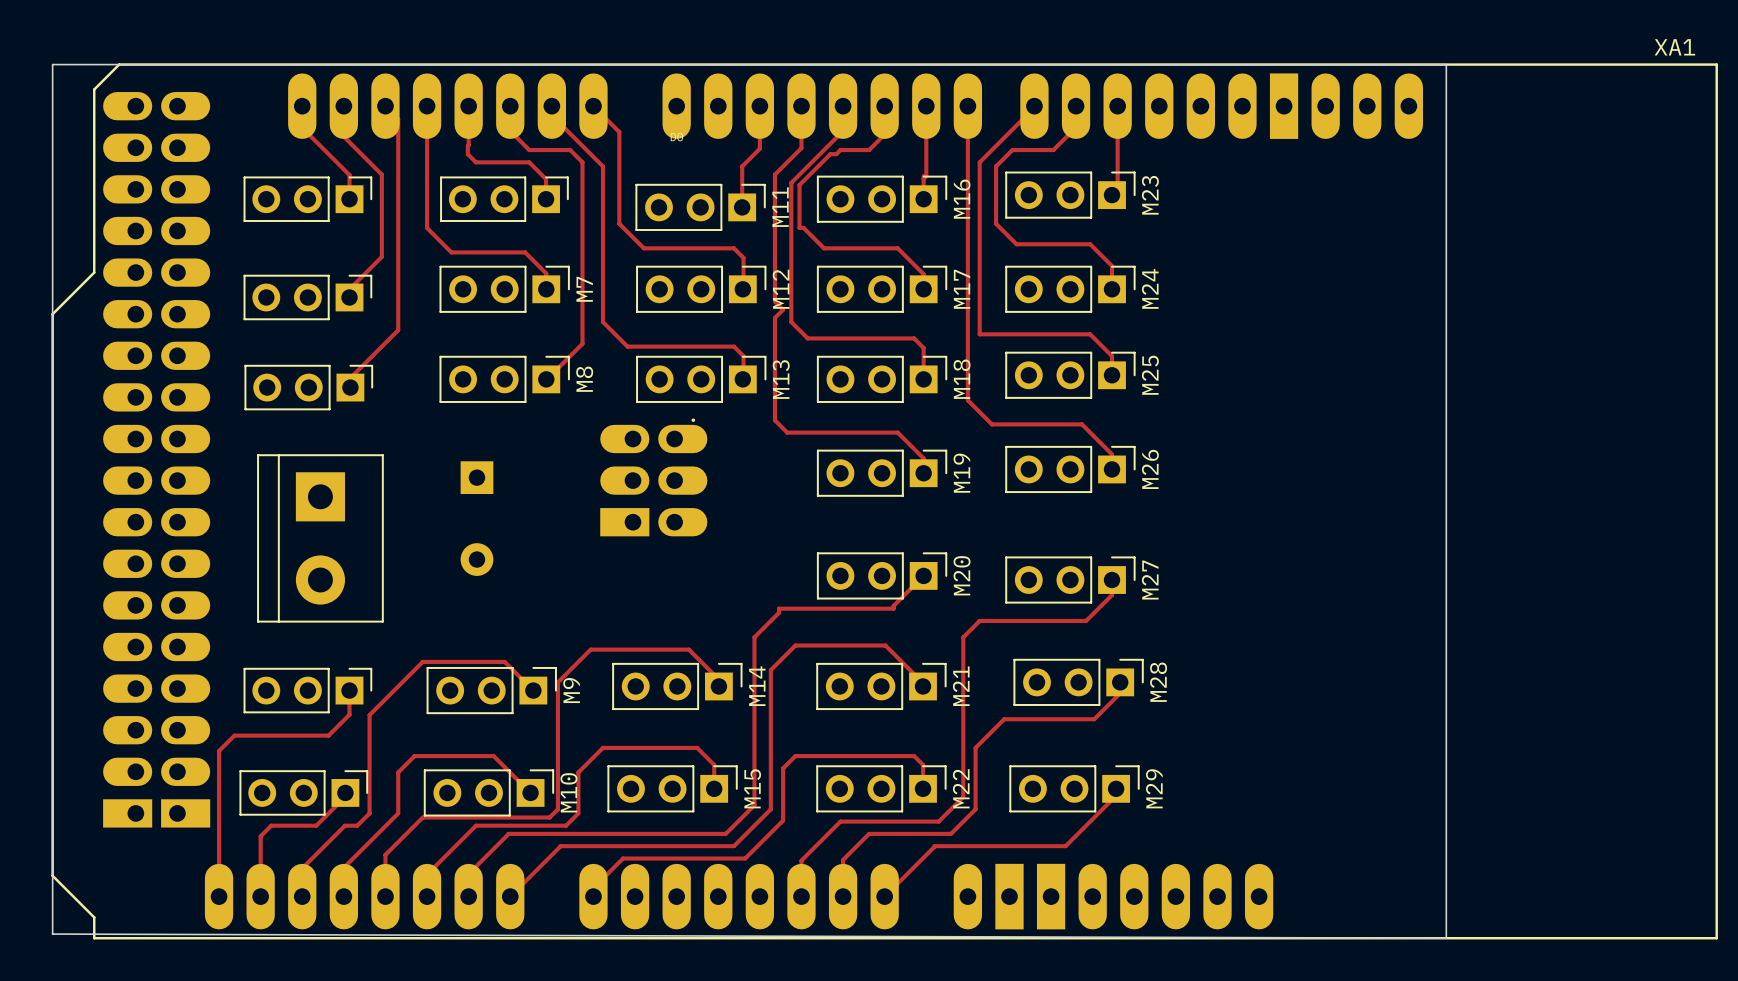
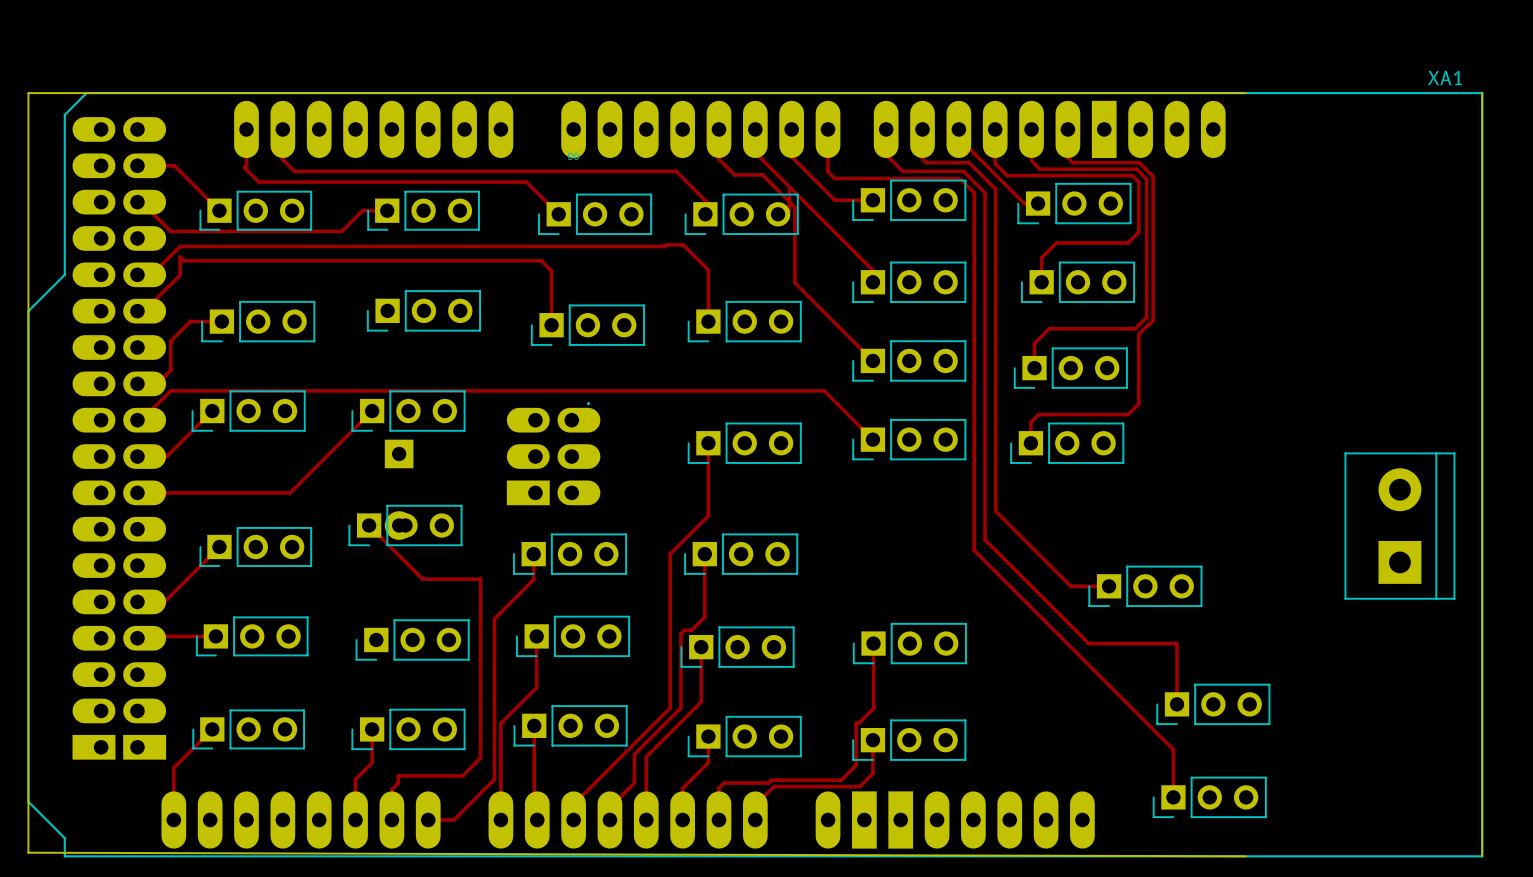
board edge: (1446, 64) (1446, 938) -> (1482, 92) (1482, 855)
top track: (385, 106) (398, 118) (398, 330) (350, 379) -> none
top track: (427, 106) (427, 228) (451, 252) (525, 252) (546, 273) (546, 289) -> none
top track: (468, 106) (467, 154) (476, 162) (529, 162) (546, 179) (546, 199) -> none
top track: (510, 106) (510, 131) (529, 150) (570, 150) (582, 162) (582, 343) (546, 379) -> none
top track: (551, 106) (551, 115) (602, 166) (602, 322) (627, 346) (734, 346) (743, 356) (743, 379) -> none
top track: (593, 106) (619, 132) (619, 223) (643, 248) (734, 248) (743, 257) (743, 289) -> none
top track: (759, 106) (759, 148) (742, 166) (742, 207) -> none
top track: (801, 106) (801, 148) (774, 174) (774, 301) (783, 309) (774, 317) (774, 420) (787, 432) (897, 432) (923, 458) (923, 473) -> none
top track: (1034, 106) (979, 162) (979, 334) (1090, 334) (1112, 356) (1112, 375) -> none
top track: (1117, 106) (1117, 189) (1112, 195) -> none
top track: none -> (995, 129) (995, 163) (1007, 175) (1132, 175) (1138, 182) (1138, 232) (1128, 242) (1056, 242) (1041, 257) (1041, 282)
top track: none -> (1031, 129) (1031, 160) (1040, 169) (1136, 169) (1146, 179) (1146, 318) (1135, 328) (1049, 328) (1034, 343) (1034, 368)
top track: none -> (1067, 129) (1067, 157) (1072, 162) (1139, 162) (1153, 176) (1153, 320) (1138, 334) (1138, 403) (1128, 414) (1038, 414) (1030, 422) (1030, 443)
top track: none -> (958, 138) (1024, 203) (1038, 203)
top track: (302, 127) (349, 175) (349, 199) -> (246, 148) (246, 165) (244, 167) (258, 182) (526, 182) (558, 214)
top track: (1076, 127) (1053, 150) (1012, 150) (996, 166) (996, 223) (1016, 244) (1090, 244) (1112, 266) (1112, 289) -> (922, 147) (922, 158) (926, 162) (969, 162) (995, 189) (995, 511) (1070, 586) (1109, 586)
top track: (843, 131) (791, 182) (791, 322) (807, 338) (914, 338) (923, 347) (923, 379) -> (718, 151) (718, 159) (734, 174) (762, 174) (794, 207) (794, 282) (872, 360)
top track: none -> (755, 152) (872, 270) (872, 282)
top track: (884, 134) (869, 150) (840, 150) (836, 154) (830, 154) (799, 185) (799, 227) (803, 227) (824, 248) (897, 248) (923, 274) (923, 289) -> none
top track: none -> (886, 154) (902, 171) (963, 171) (984, 192) (984, 539) (1088, 643) (1177, 643)
top track: (343, 136) (381, 174) (381, 256) (349, 289) -> (282, 156) (282, 159) (294, 171) (676, 171) (708, 203)
top track: (926, 137) (926, 176) (923, 178) -> (791, 156) (835, 200) (872, 200)
top track: none -> (137, 165) (174, 165) (219, 210)
top track: (967, 153) (967, 400) (991, 424) (1082, 424) (1112, 454) (1112, 469) -> (828, 170) (834, 178) (959, 178) (974, 192) (974, 550) (1173, 749) (1173, 797)
part: none -> (909, 200)
top track: none -> (141, 202) (170, 231) (341, 231) (362, 210) (387, 210)
part: none -> (1074, 203)
M23: (1070, 195) -> none
part rotation: 0° (307, 199) -> 180° (255, 210)
part rotation: 0° (504, 199) -> 180° (423, 210)
M16: (882, 199) -> none
part: none -> (595, 214)
part: none -> (741, 214)
M11: (700, 207) -> none
top track: none -> (151, 274) (180, 246) (665, 246) (683, 244) (708, 270) (708, 321)
part: none -> (909, 282)
part: none -> (1078, 282)
M7: (504, 289) -> none
M12: (701, 289) -> none
M17: (882, 289) -> none
M24: (1070, 289) -> none
part: (307, 297) -> none
part: none -> (423, 310)
top track: none -> (144, 311) (180, 275) (180, 257) (183, 260) (541, 260) (551, 270) (551, 325)
top track: none -> (221, 321) (190, 321) (170, 341) (170, 370) (157, 383)
part: none -> (258, 321)
part: none -> (744, 321)
part: none -> (587, 325)
part: none -> (909, 360)
M25: (1070, 375) -> none
M8: (504, 379) -> none
M13: (701, 379) -> none
M18: (882, 379) -> none
part: none -> (1070, 368)
part: (308, 387) -> none
top track: none -> (212, 411) (166, 456) (137, 456)
part: none -> (248, 411)
top track: none -> (372, 411) (290, 492) (137, 492)
part: none -> (408, 411)
top track: none -> (141, 420) (170, 390) (824, 390) (872, 439)
part: none -> (909, 439)
top track: none -> (708, 443) (708, 515) (670, 554) (670, 707) (573, 804)
part: none -> (744, 443)
part: none -> (1067, 443)
M26: (1070, 469) -> none
M19: (882, 473) -> none
part: (320, 538) -> none
part: none -> (405, 525)
part: none -> (1399, 526)
M20: (882, 575) -> none
top track: (923, 575) (893, 605) (893, 608) (779, 608) (779, 612) (754, 637) (754, 805) (725, 833) (508, 833) (468, 874) -> (369, 525) (422, 579) (480, 579) (480, 758) (462, 775) (398, 775) (398, 783) (391, 789) (391, 800)
M27: (1070, 580) -> none
top track: (1112, 580) (1112, 595) (1086, 620) (979, 620) (963, 637) (963, 797) (938, 821) (840, 821) (830, 831) -> (708, 736) (708, 762)
top track: none -> (219, 546) (164, 601) (137, 601)
part: none -> (255, 546)
part: none -> (570, 554)
top track: none -> (704, 554) (704, 617) (691, 630) (684, 630) (680, 633) (680, 707) (634, 754) (634, 783) (609, 807)
part: none -> (741, 554)
part: none -> (1145, 586)
M28: (1078, 682) -> none
top track: (1120, 682) (1120, 693) (1094, 719) (1004, 719) (975, 747) (975, 809) (951, 833) (869, 833) (848, 854) -> (856, 756) (856, 765) (841, 780) (771, 780) (768, 783) (723, 783)
top track: none -> (139, 636) (215, 636)
part: none -> (573, 636)
M14: (677, 686) -> none
top track: (718, 686) (718, 679) (688, 649) (590, 649) (557, 682) (557, 809) (549, 817) (422, 817) (385, 854) (385, 896) -> none
M21: (881, 686) -> none
top track: (923, 686) (923, 683) (885, 645) (795, 645) (770, 670) (770, 809) (734, 846) (560, 846) (510, 896) -> (533, 554) (533, 579) (494, 618) (494, 779) (453, 819) (428, 819)
part rotation: 0° (307, 690) -> 180° (252, 636)
top track: (349, 690) (349, 714) (328, 735) (234, 735) (219, 751) (219, 836) -> (212, 729) (173, 767)
M9: (491, 690) -> none
part: none -> (412, 639)
top track: (533, 690) (504, 661) (422, 661) (369, 715) (369, 813) (357, 825) (345, 825) (302, 868) (302, 896) -> none
top track: none -> (873, 643) (874, 707) (858, 723) (856, 723) (856, 756)
part: none -> (909, 643)
top track: none -> (1174, 643) (1177, 645) (1177, 704)
top track: none -> (701, 647) (701, 701) (646, 756) (646, 819)
part: none -> (737, 647)
part: none -> (1213, 704)
top track: none -> (534, 725) (534, 816)
M15: (672, 788) -> none
part: none -> (570, 725)
top track: (714, 788) (714, 764) (697, 747) (602, 747) (578, 772) (578, 813) (566, 825) (476, 825) (427, 874) -> (355, 779) (355, 800)
M22: (881, 788) -> none
top track: (923, 788) (923, 764) (914, 756) (795, 756) (783, 768) (783, 820) (745, 858) (623, 858) (593, 888) -> (536, 636) (536, 687) (500, 723) (500, 812)
M29: (1074, 788) -> none
top track: (1116, 788) (1116, 795) (1065, 846) (934, 846) (884, 896) -> none
part rotation: 0° (303, 792) -> 180° (248, 729)
top track: (345, 792) (345, 796) (316, 825) (271, 825) (260, 836) (260, 896) -> none
top track: none -> (372, 729) (372, 762) (355, 779)
part: none -> (408, 729)
M10: (488, 792) -> none
top track: (530, 792) (493, 756) (414, 756) (398, 772) (398, 813) (343, 867) (343, 896) -> none
part: none -> (744, 736)
top track: none -> (872, 740) (872, 773) (859, 786) (773, 786) (755, 805)
part: none -> (909, 740)
part: none -> (1209, 797)

